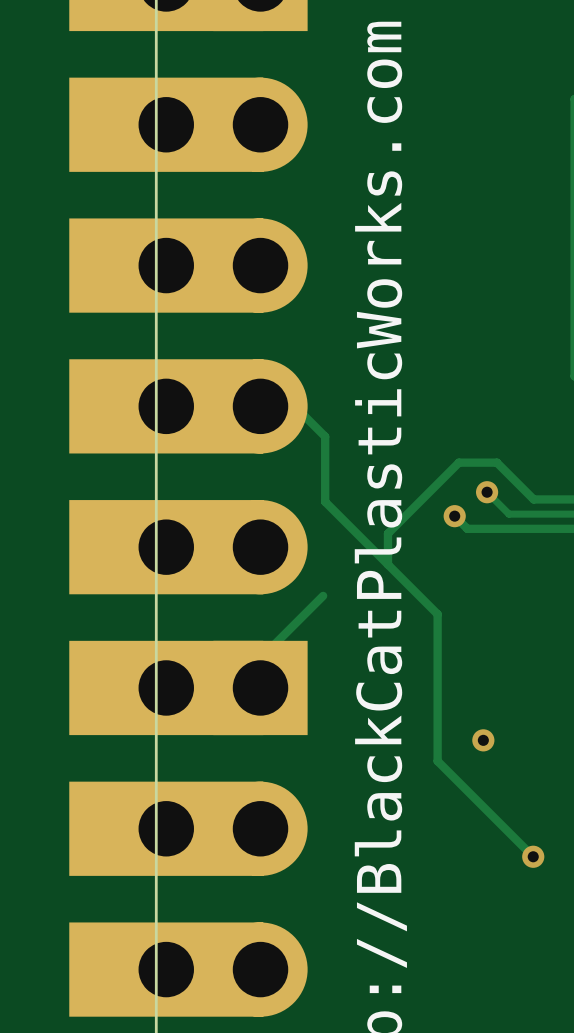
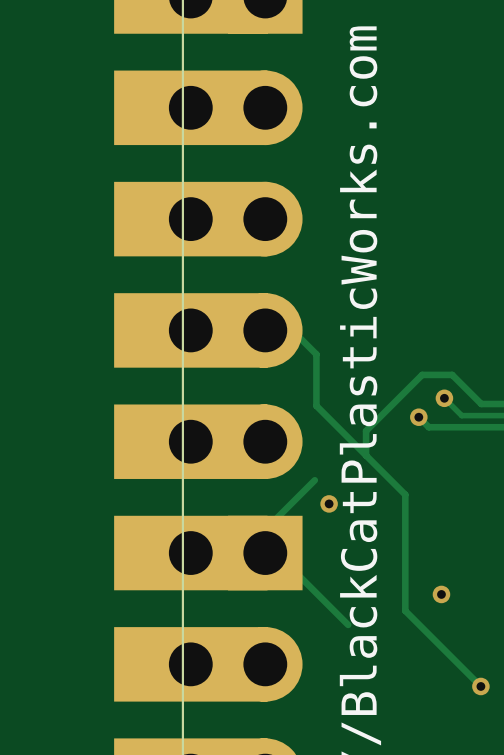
via: none -> (329, 503)
track: none -> (262, 532) (262, 554) (277, 554) (348, 624)

